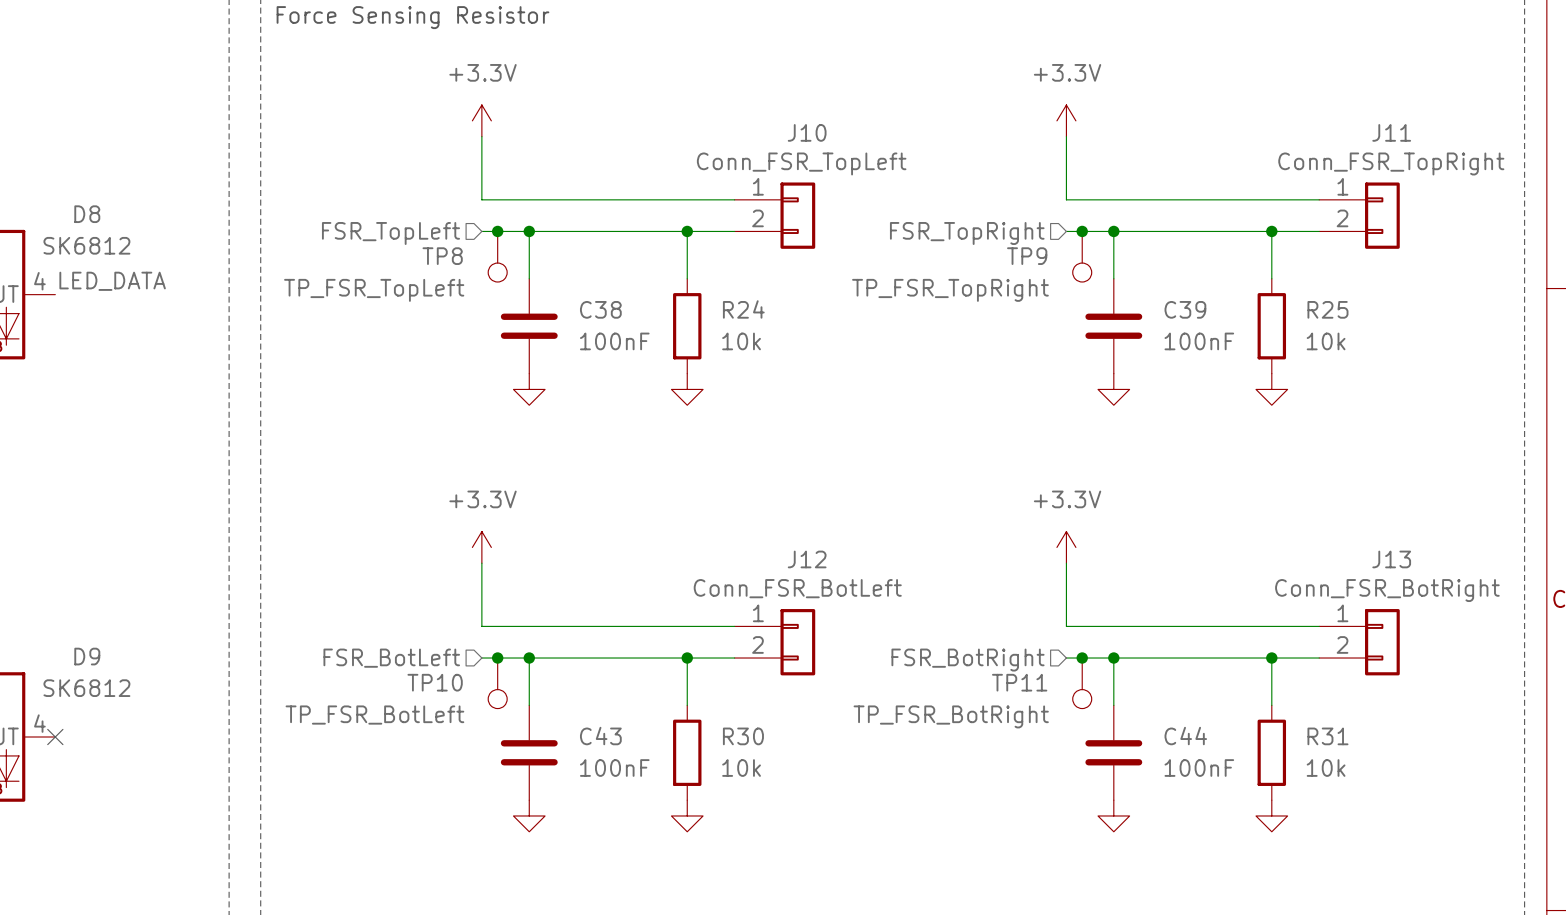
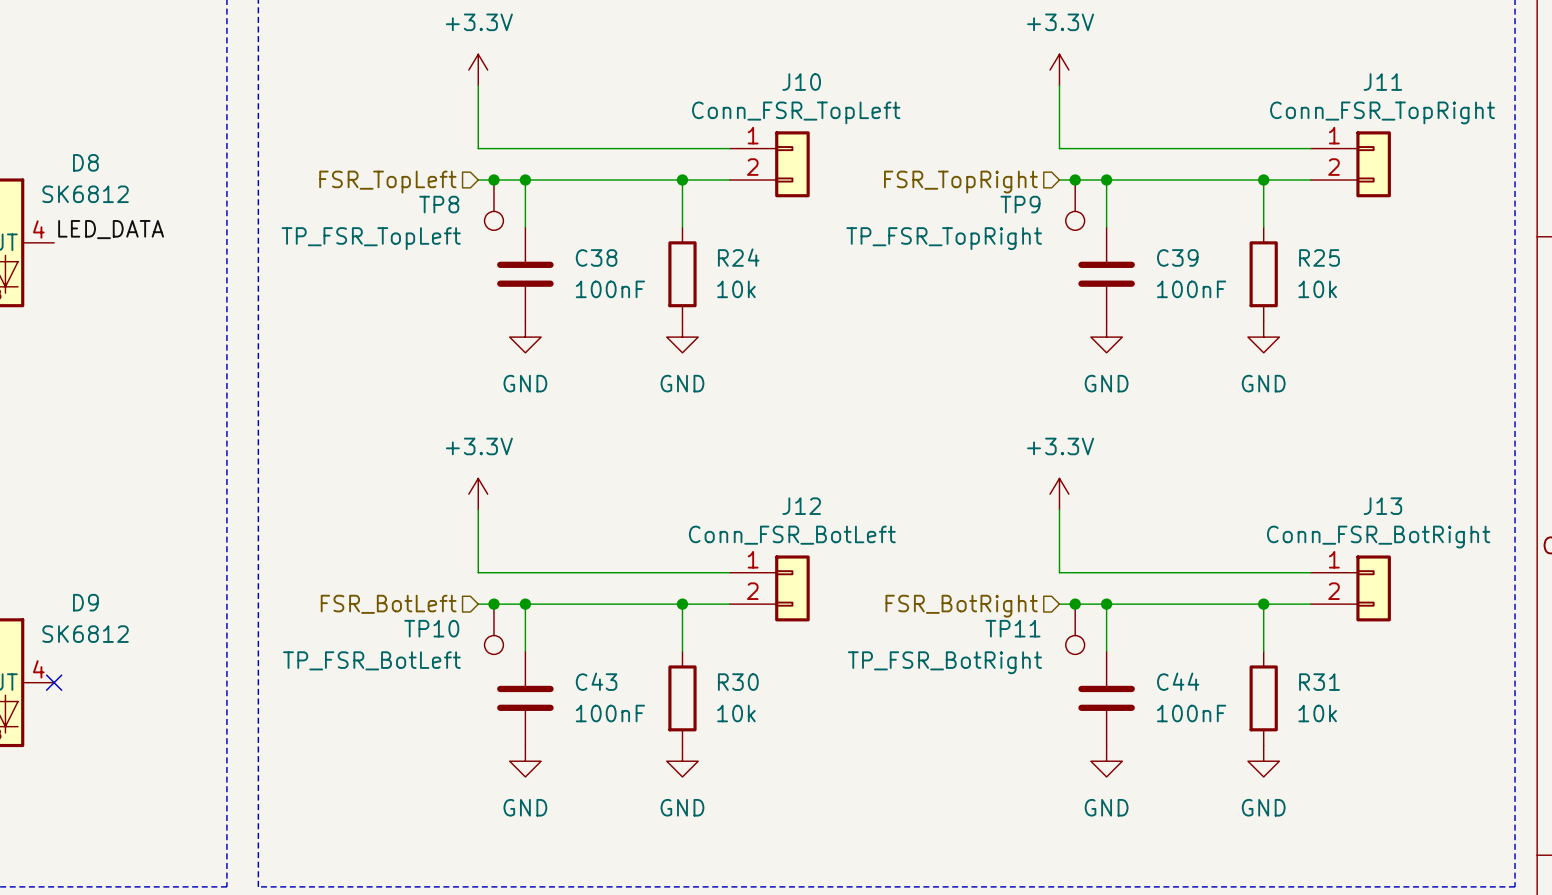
power symbol text: none -> GND (525, 383)
power symbol text: none -> GND (682, 383)
power symbol text: none -> GND (1106, 383)
power symbol text: none -> GND (1263, 383)
power symbol text: none -> GND (525, 807)
power symbol text: none -> GND (682, 807)
power symbol text: none -> GND (1106, 807)
power symbol text: none -> GND (1263, 807)

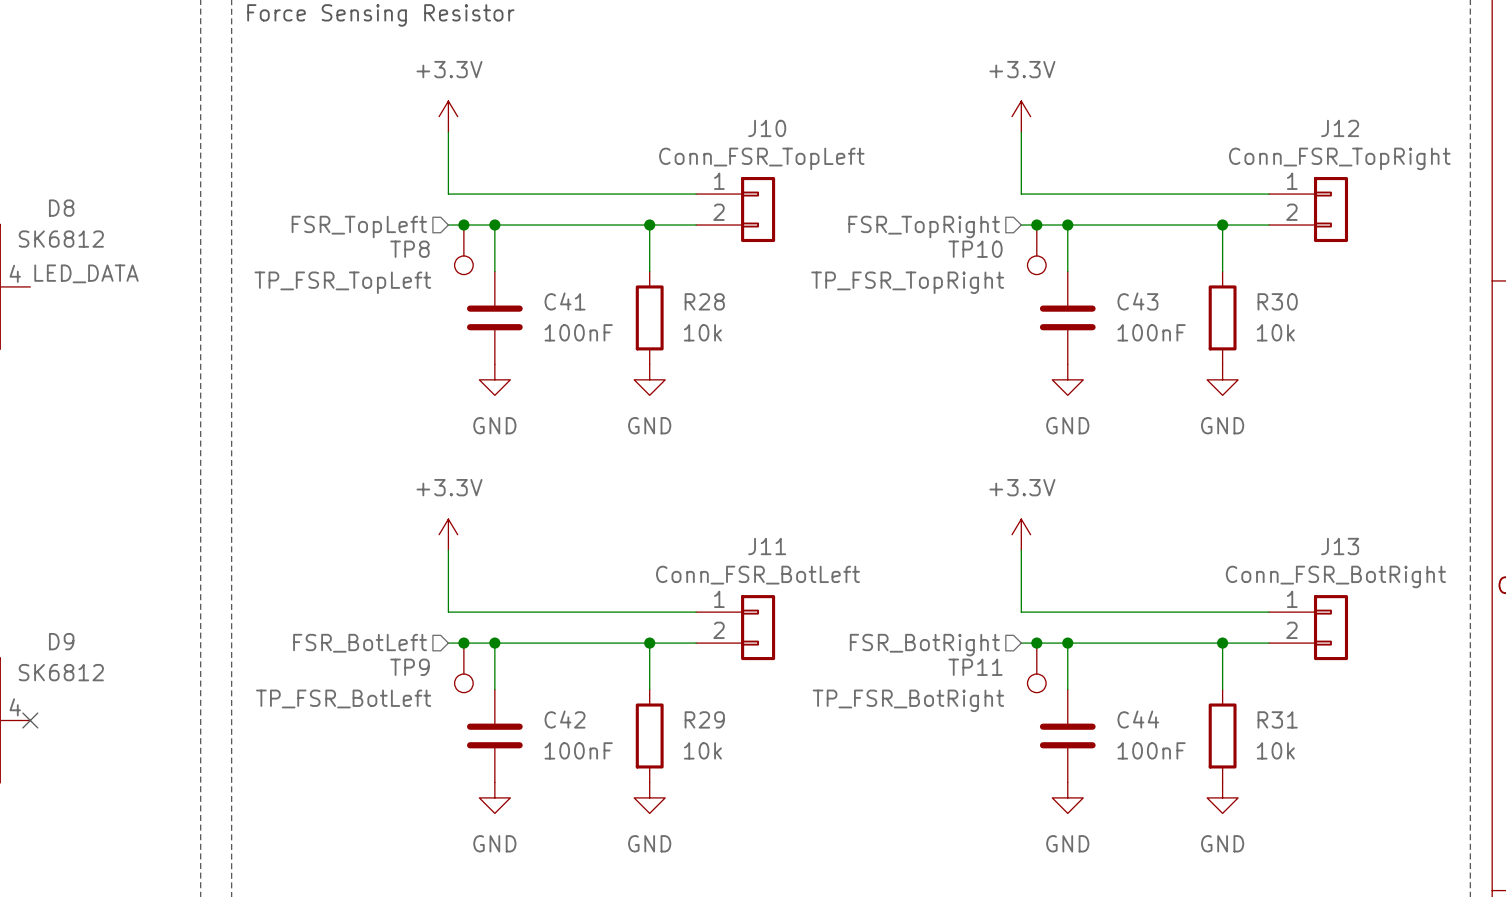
J11 name: J11 (1382, 82) -> J12 (1340, 128)
TP9 name: TP9 (1020, 204) -> TP10 (975, 249)
C38 name: C38 (596, 257) -> C41 (565, 301)
R24 name: R24 (738, 257) -> R28 (704, 301)
C39 name: C39 (1177, 257) -> C43 (1137, 301)
R25 name: R25 (1319, 257) -> R30 (1277, 301)
J12 name: J12 (801, 506) -> J11 (767, 546)
TP10 name: TP10 (431, 628) -> TP9 (409, 667)
C43 name: C43 (596, 681) -> C42 (565, 719)
R30 name: R30 (738, 682) -> R29 (704, 719)

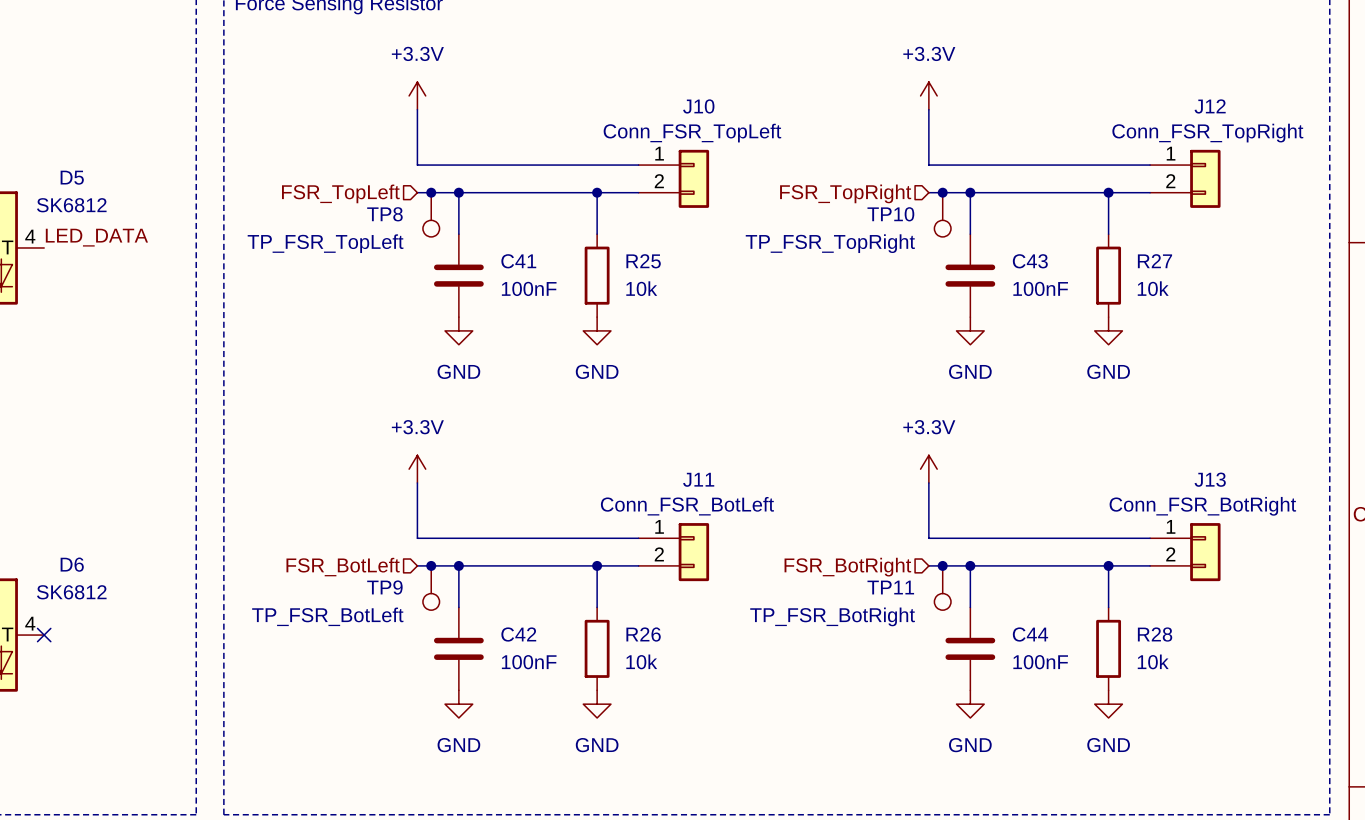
D8 name: D8 (61, 208) -> D5 (72, 177)
R28 name: R28 (704, 301) -> R25 (643, 261)
R30 name: R30 (1277, 301) -> R27 (1154, 261)
D9 name: D9 (61, 641) -> D6 (72, 564)
R29 name: R29 (704, 719) -> R26 (643, 634)
R31 name: R31 (1277, 719) -> R28 (1155, 634)

